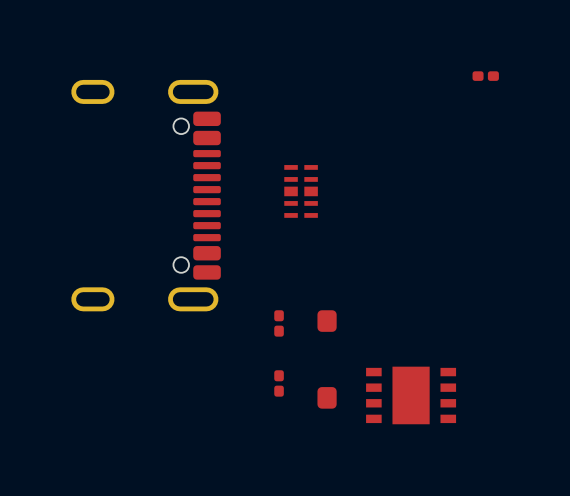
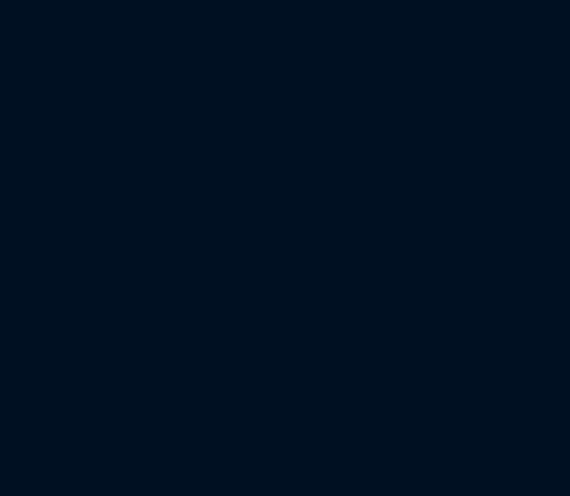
part: (485, 76) -> none
part: (301, 191) -> none
part: (146, 195) -> none
part: (279, 323) -> none
part: (327, 359) -> none
part: (279, 383) -> none
part: (411, 395) -> none

